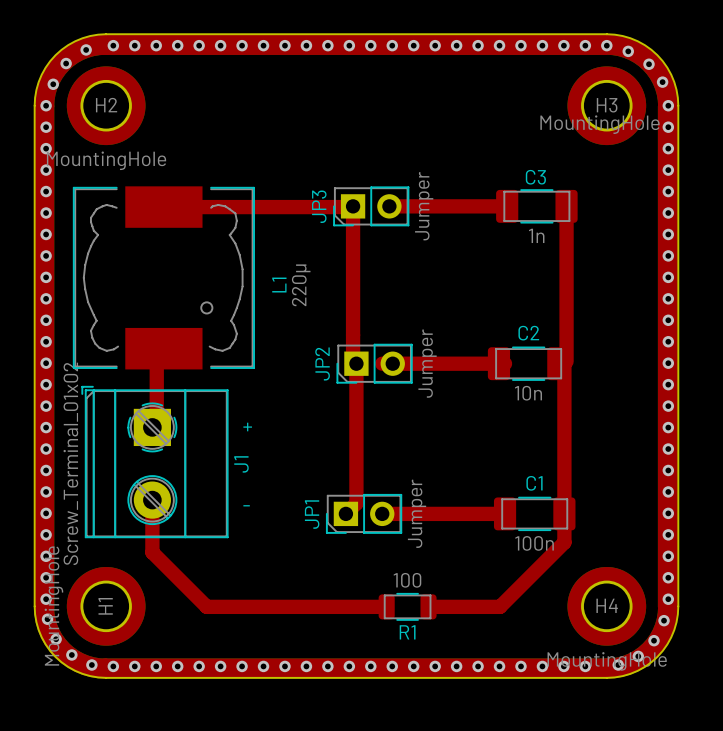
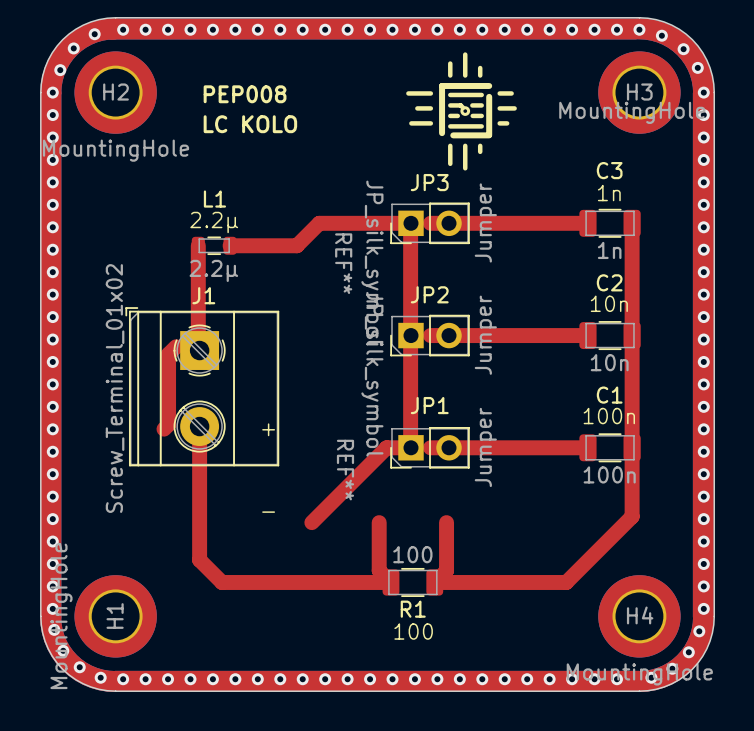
drawing: none -> [406, 52, 517, 171]
text: none -> PEP008 (245, 94)
text: none -> LC KOLO (250, 124)
L1 footprint: [72, 186, 255, 370] -> [191, 236, 237, 256]
C3 footprint: [496, 189, 578, 224] -> [579, 208, 641, 238]
text: none -> 1n (609, 193)
JP3 name rotation: 0° (319, 206) -> 90° clockwise (429, 182)
JP3 name position: JP3 (319, 206) -> JP3 (429, 182)
JP3 position: (371, 206) -> (430, 223)
top track: (389, 206) (507, 206) -> none
top track: (566, 206) (564, 542) (500, 606) (428, 606) -> none
top track: (163, 207) (353, 206) (353, 360) (356, 363) (356, 503) (345, 513) -> none
text: none -> 2.2µ (214, 222)
top track: none -> (430, 223) (587, 223)
top track: none -> (632, 223) (632, 516) (566, 582) (434, 582) (446, 570) (446, 522)
top track: none -> (198, 245) (199, 350)
top track: none -> (230, 245) (296, 245) (319, 223) (410, 223) (410, 448) (386, 447) (311, 522)
REF**: none -> JP_silk_symbol (359, 262)
L1 name position: L1 (279, 285) -> L1 (214, 199)
L1 value: 220µ (301, 285) -> 2.2µ (213, 270)
text: none -> 10n (609, 303)
top track: none -> (430, 335) (587, 335)
C2 footprint: [487, 346, 570, 381] -> [579, 321, 641, 351]
JP2 position: (374, 363) -> (430, 335)
top track: (382, 363) (505, 363) -> none
JP2 name rotation: 0° (322, 364) -> 90° clockwise (429, 294)
JP2 name position: JP2 (322, 364) -> JP2 (429, 294)
REF**: none -> JP_silk_symbol (360, 396)
text: none -> 100n (609, 416)
top track: none -> (199, 426) (199, 560) (222, 582) (390, 582) (379, 570) (379, 522)
top track: none -> (430, 447) (587, 447)
J1 position: (154, 462) -> (202, 386)
J1 name rotation: 0° (241, 464) -> 90° clockwise (203, 295)
J1 name position: J1 (241, 464) -> J1 (203, 295)
C1 footprint: [493, 496, 576, 531] -> [579, 433, 641, 463]
top track: (152, 500) (152, 552) (206, 606) (386, 606) -> none
JP1 position: (364, 513) -> (430, 447)
top track: (382, 513) (505, 513) -> none
JP1 name rotation: 0° (312, 514) -> 90° clockwise (429, 405)
JP1 name position: JP1 (312, 514) -> JP1 (429, 405)
R1 position: (407, 606) -> (412, 582)
text: none -> 100 (413, 631)

